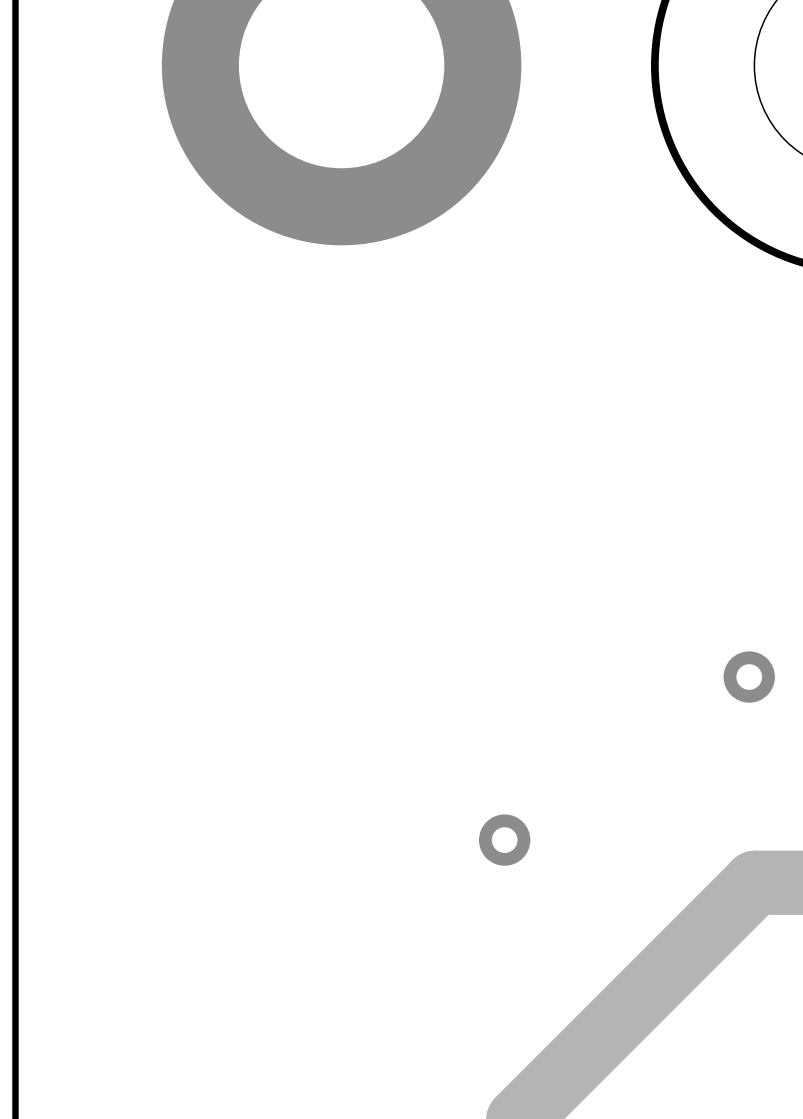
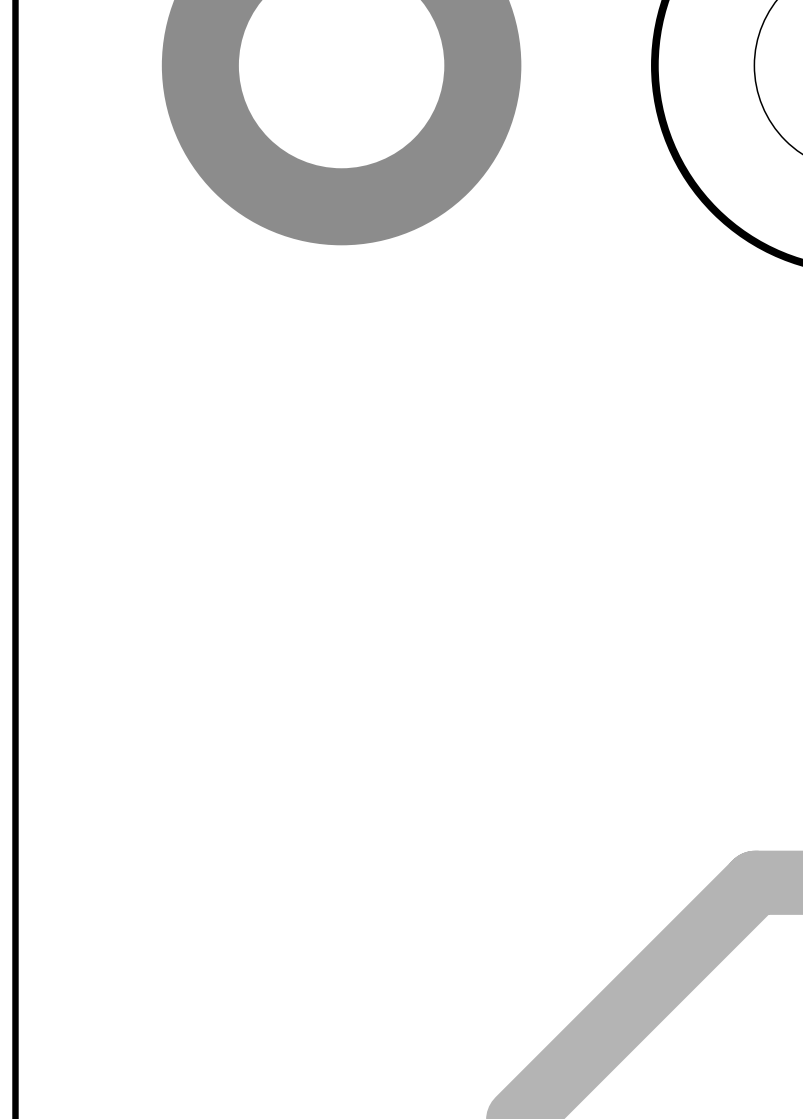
via: (749, 677) -> none
via: (504, 840) -> none

